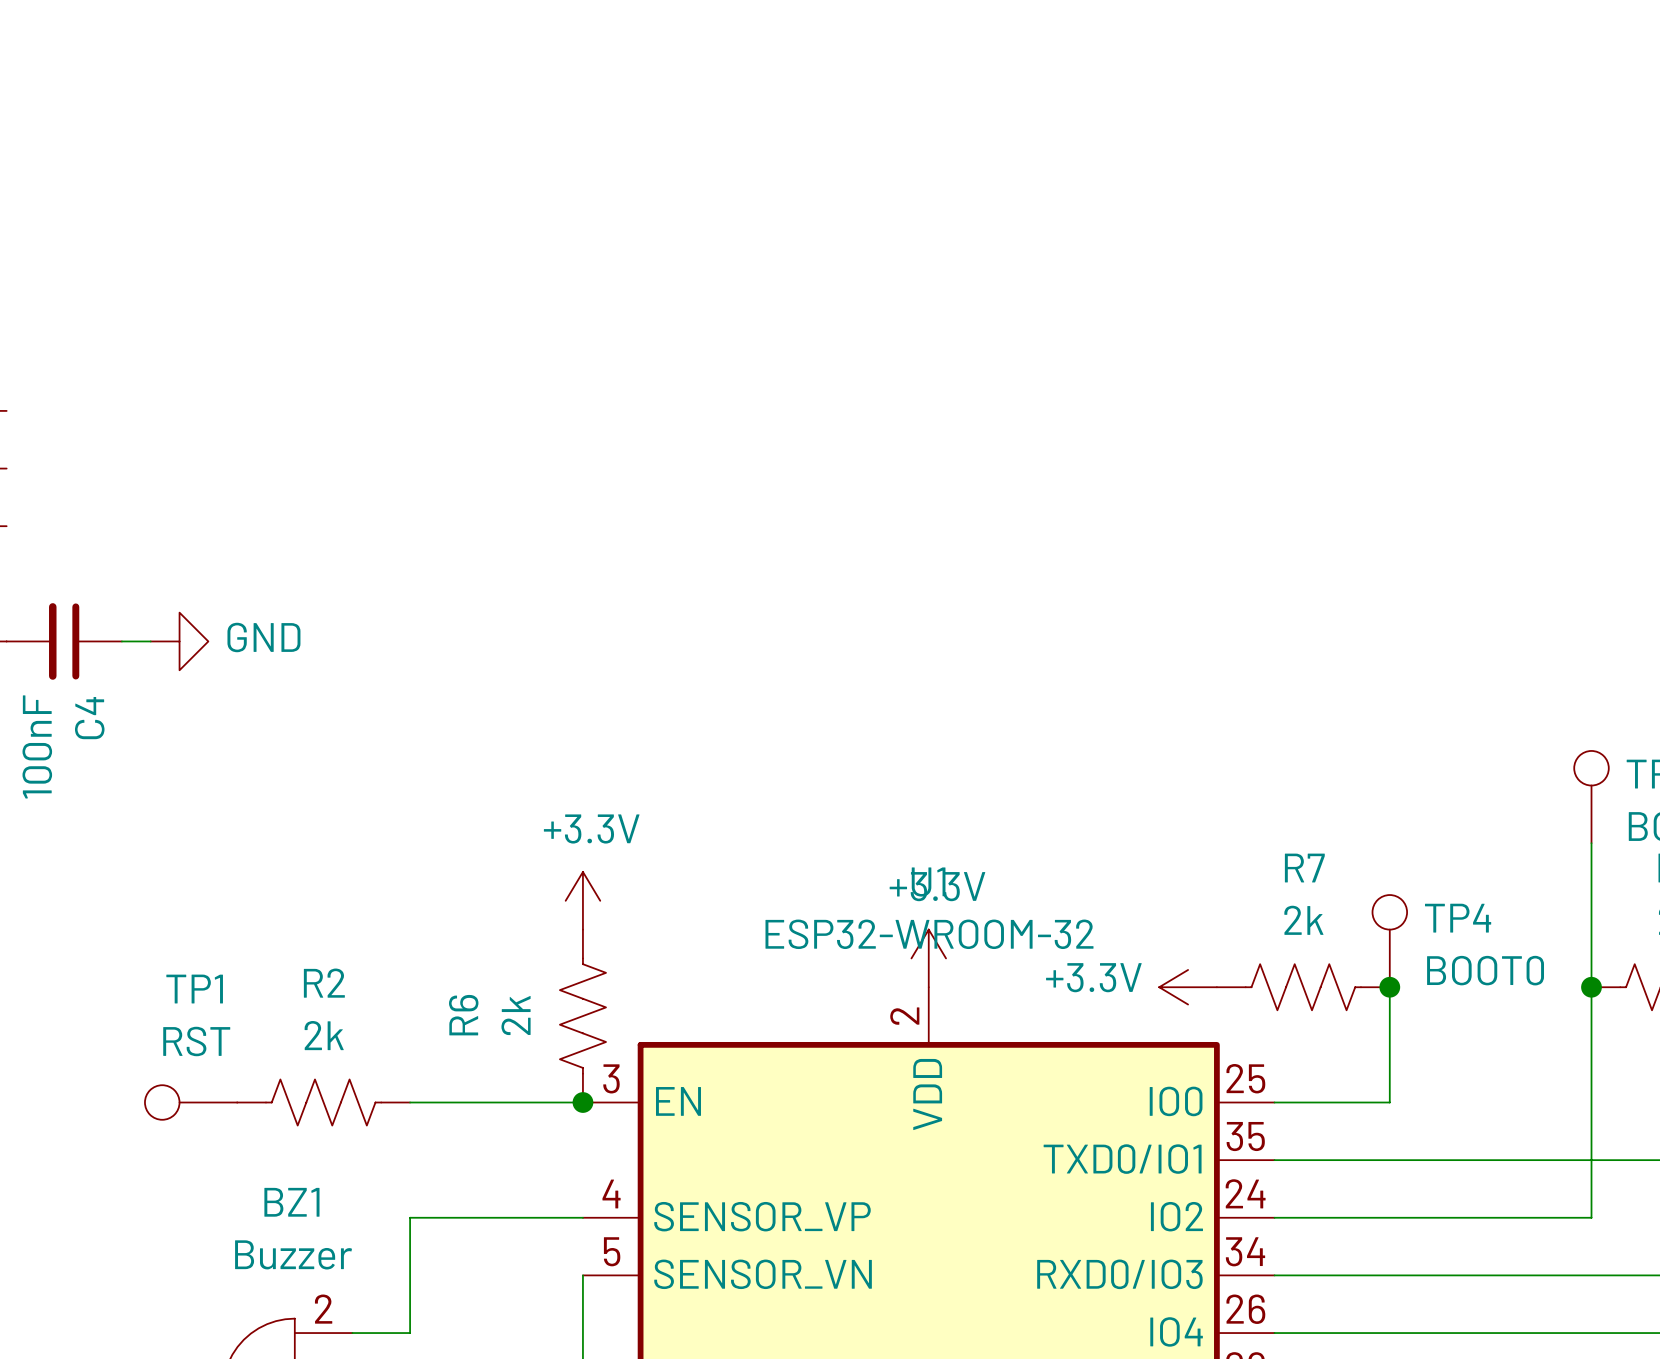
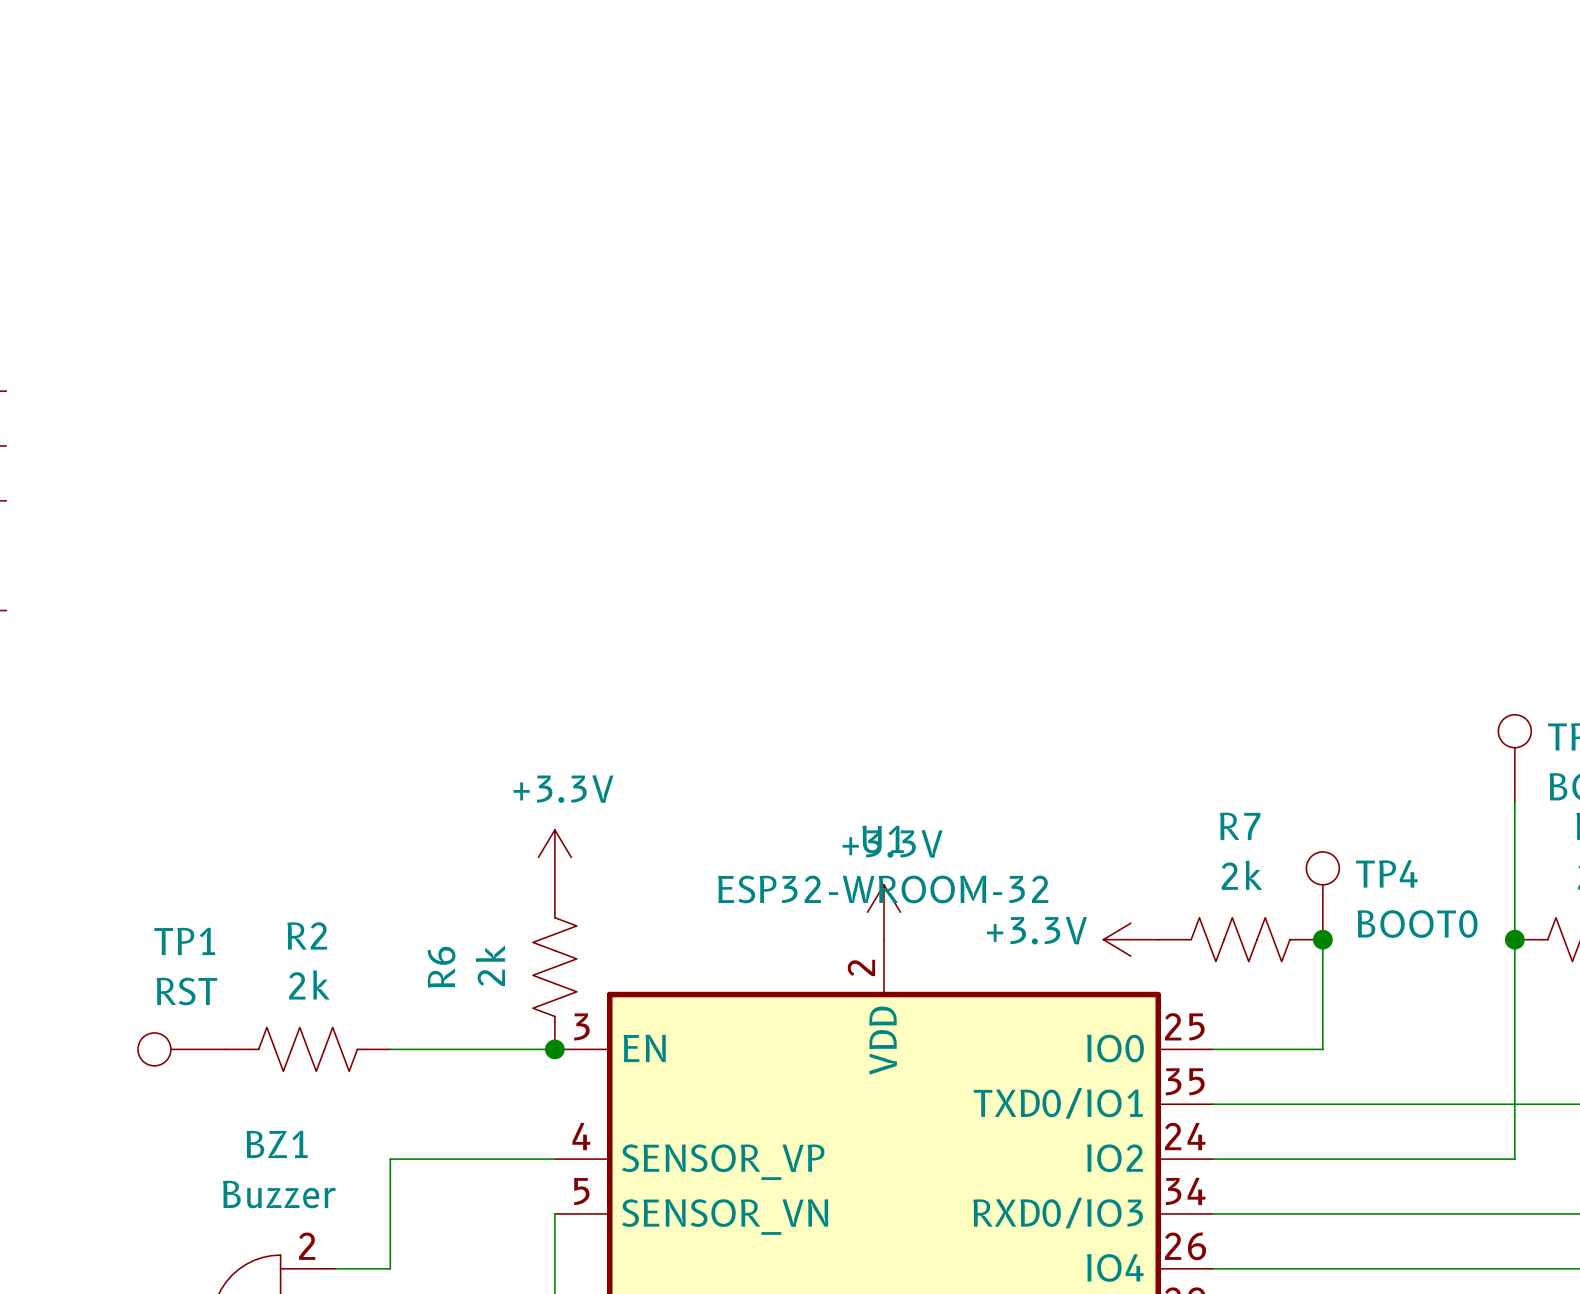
C4: 100nF (64, 641) -> none
wire: (121, 641) (150, 641) -> none
power symbol: GND (179, 641) -> none

